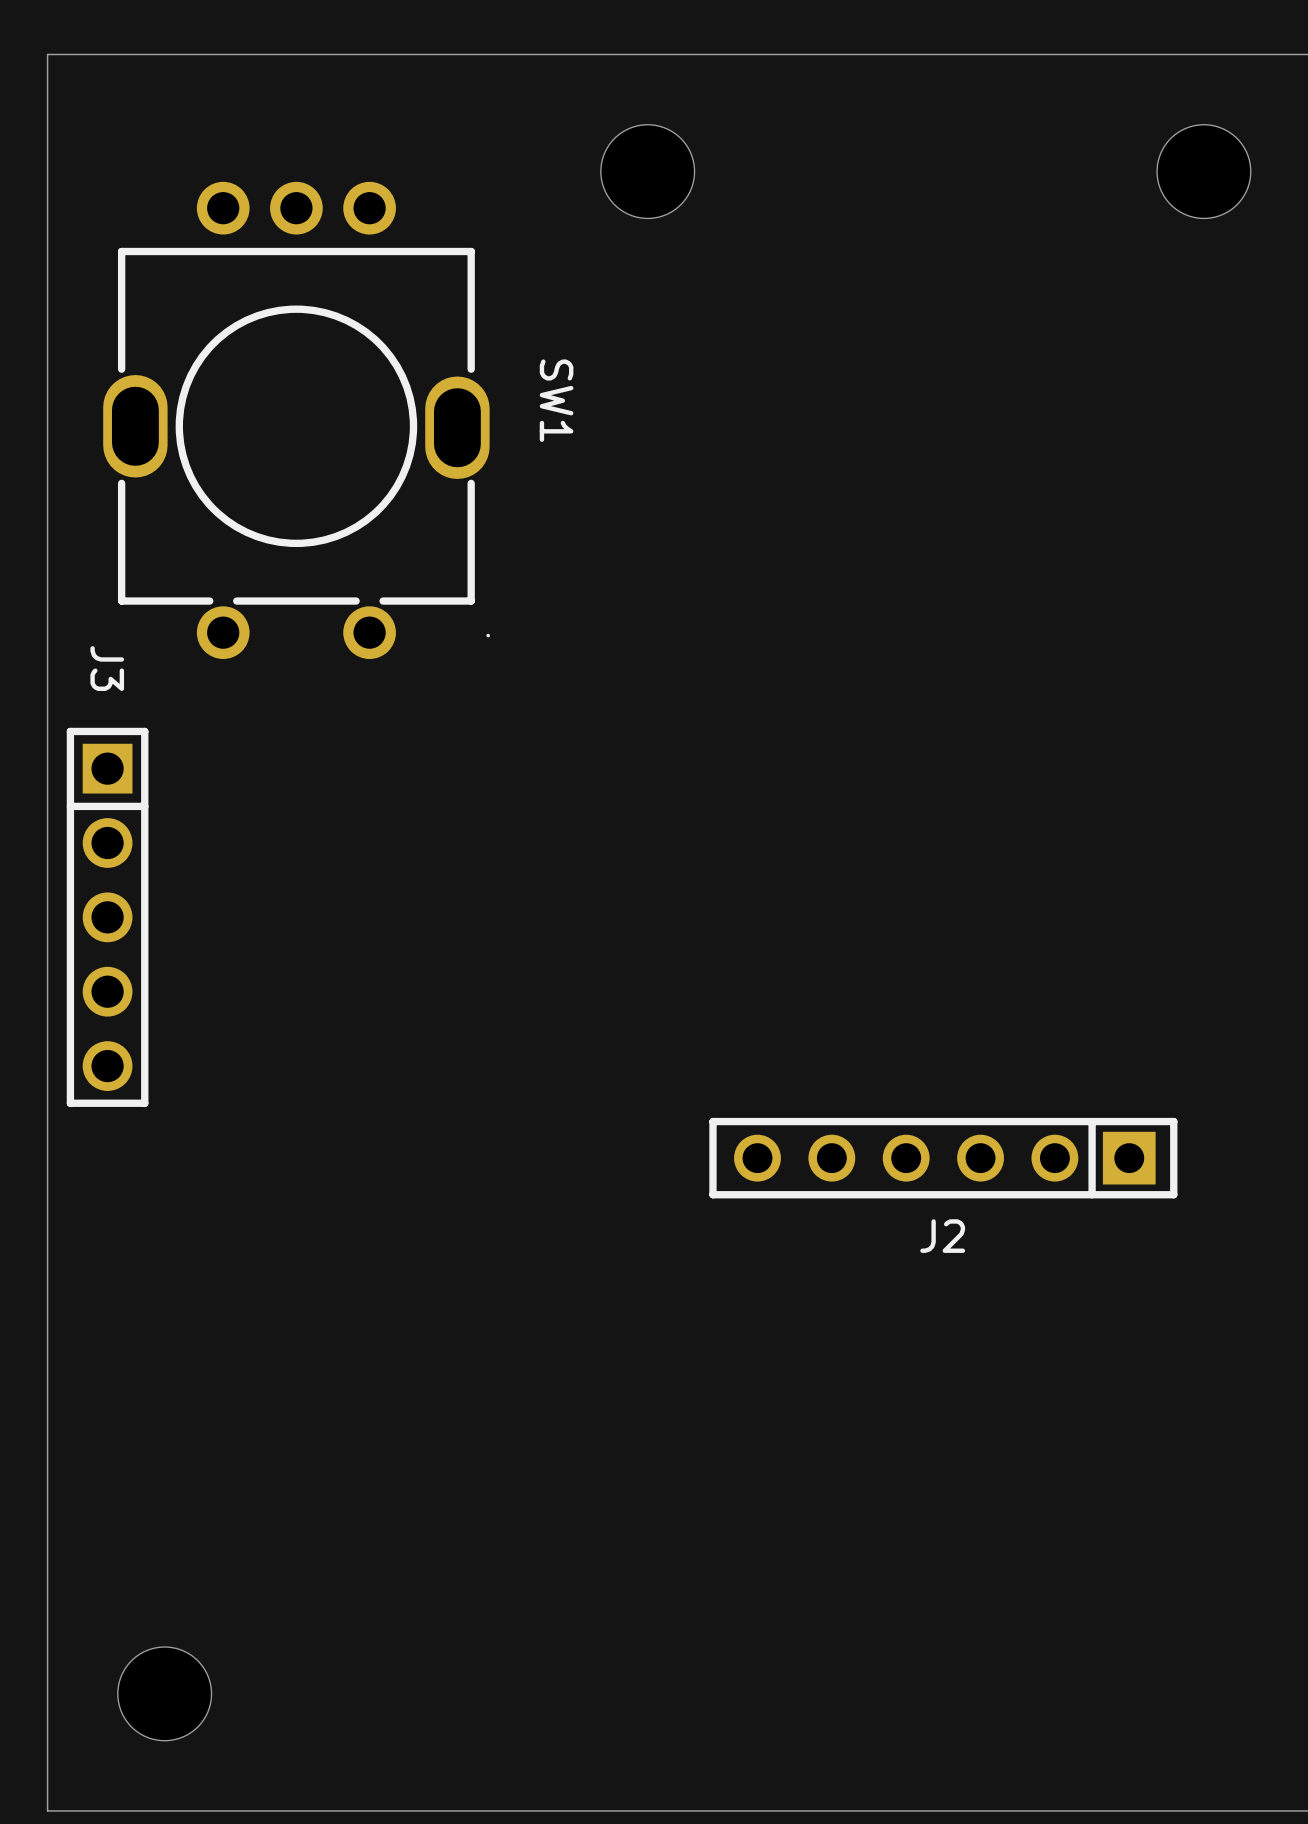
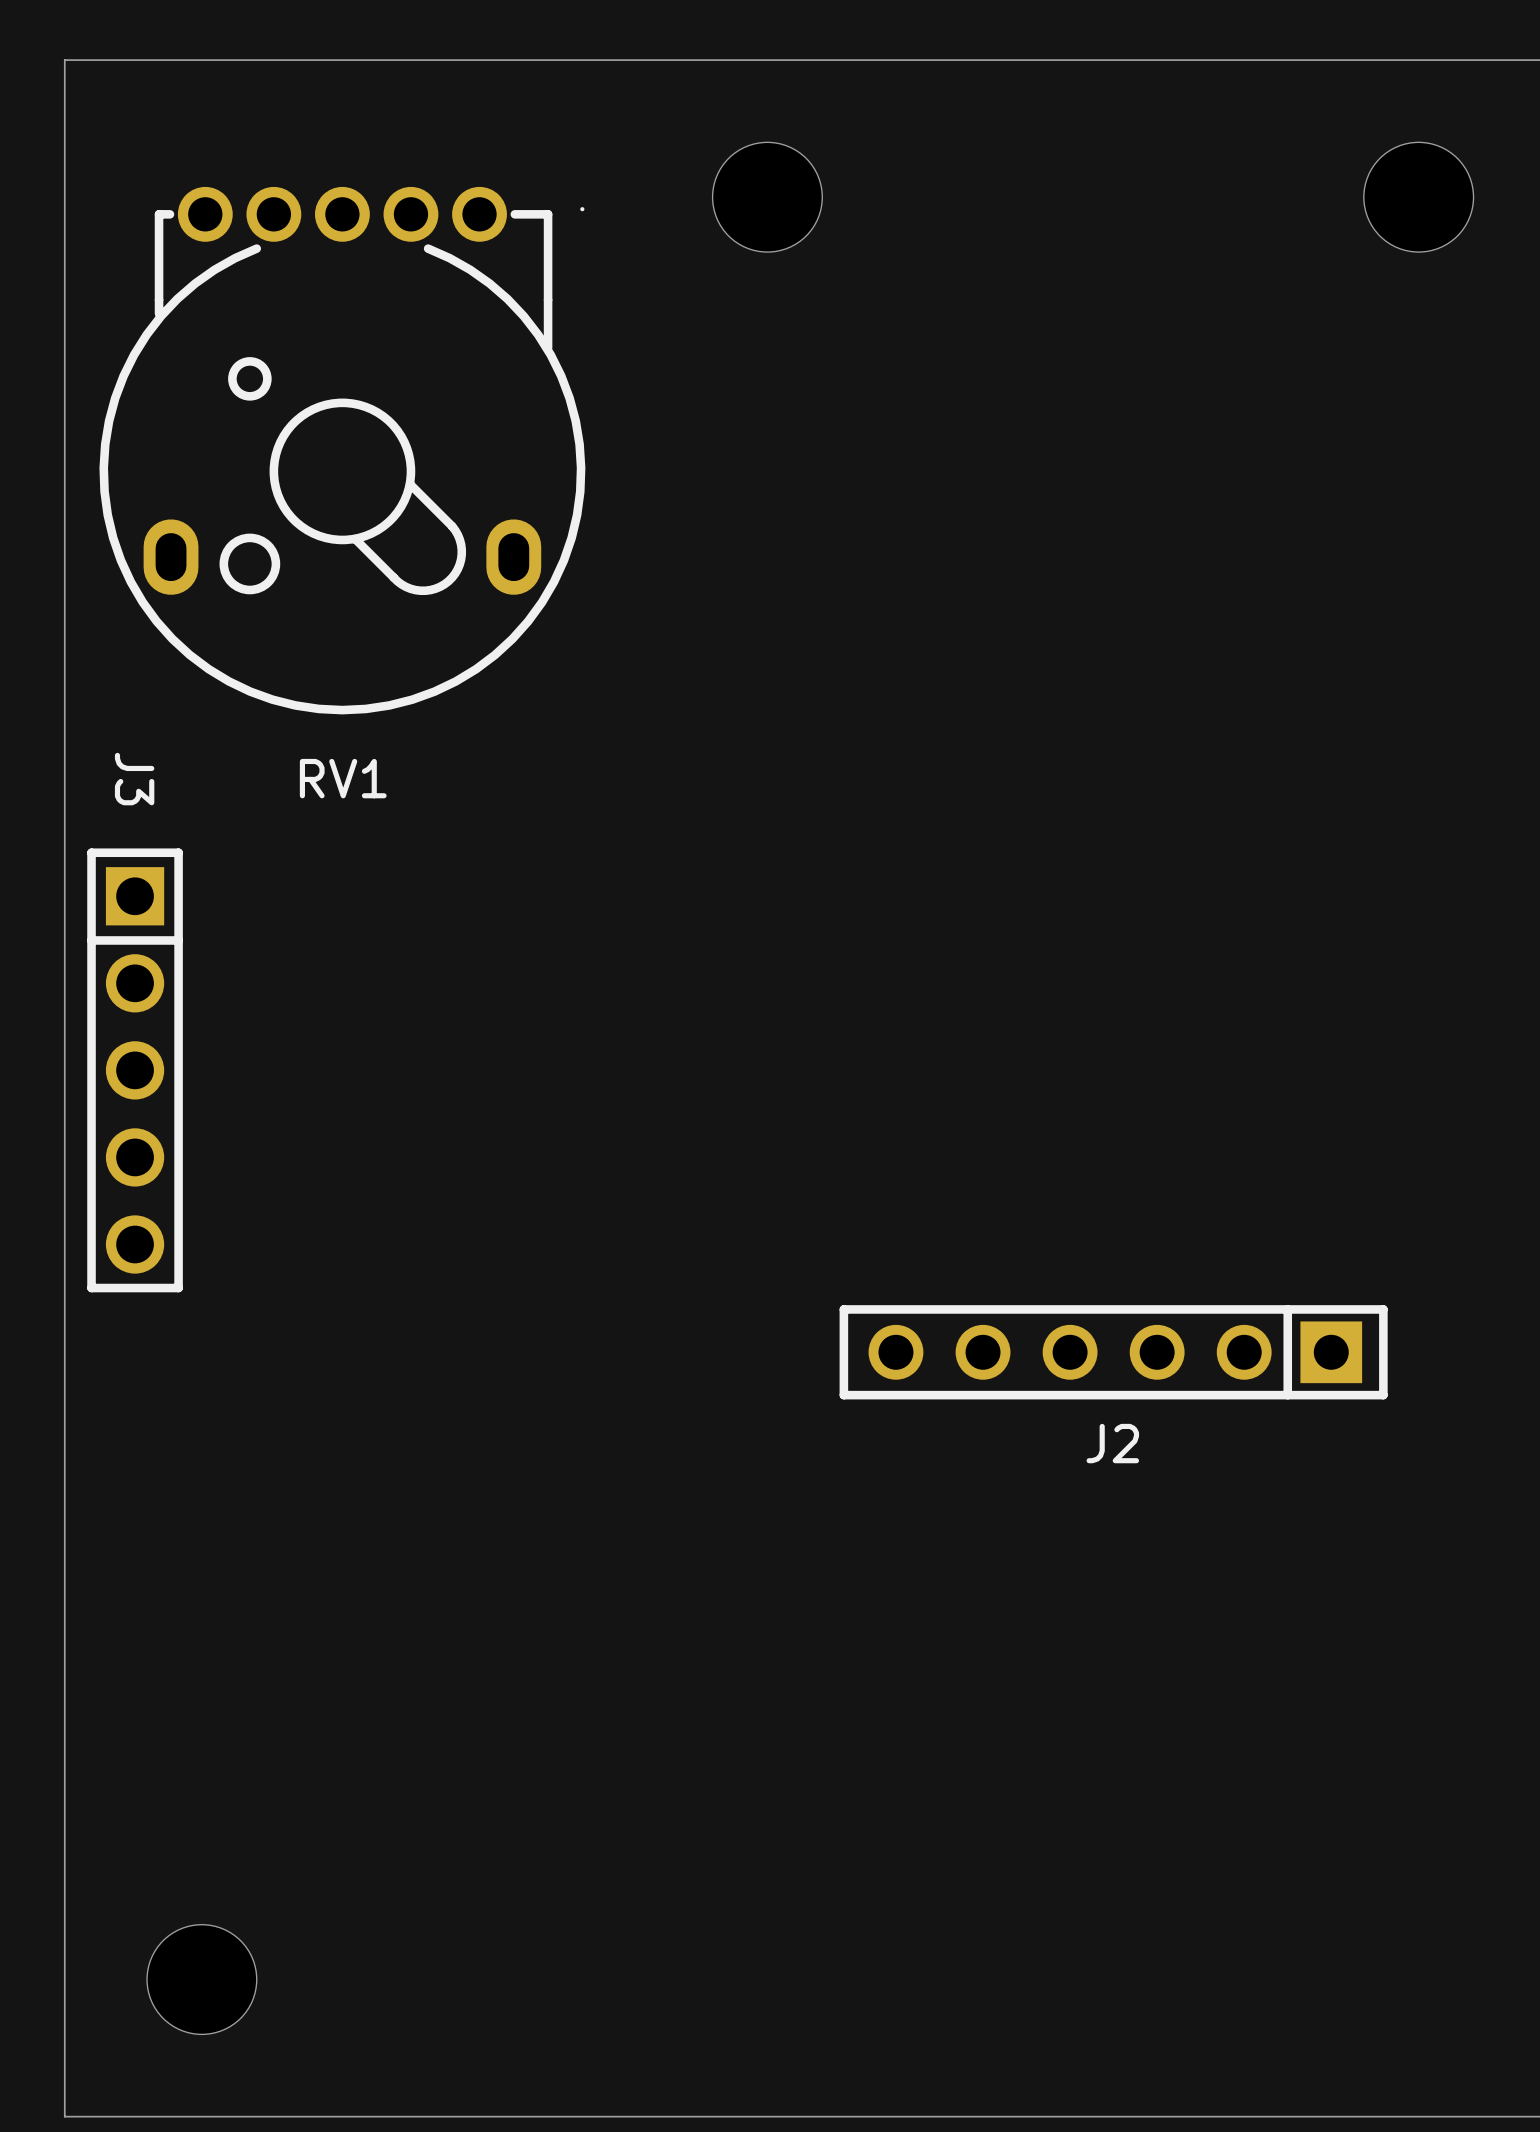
RV1: none -> (342, 450)
SW1: (296, 420) -> none

